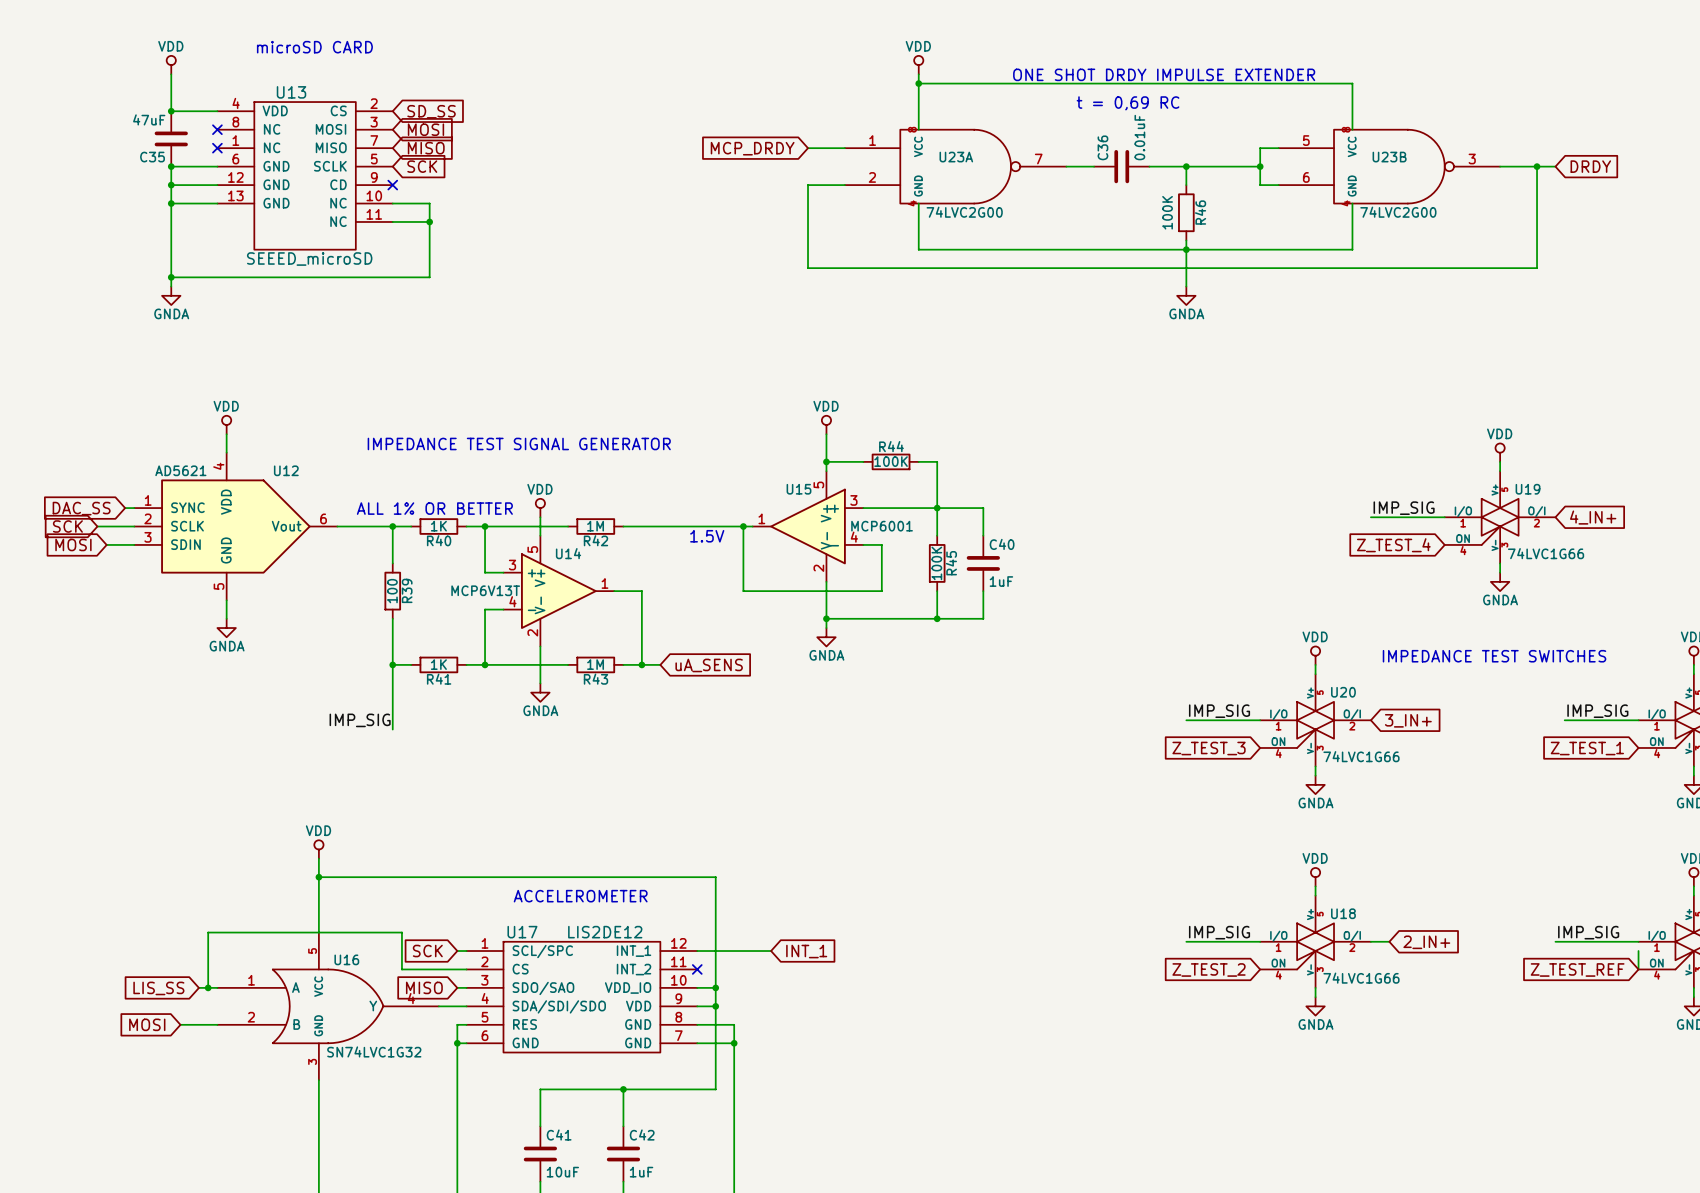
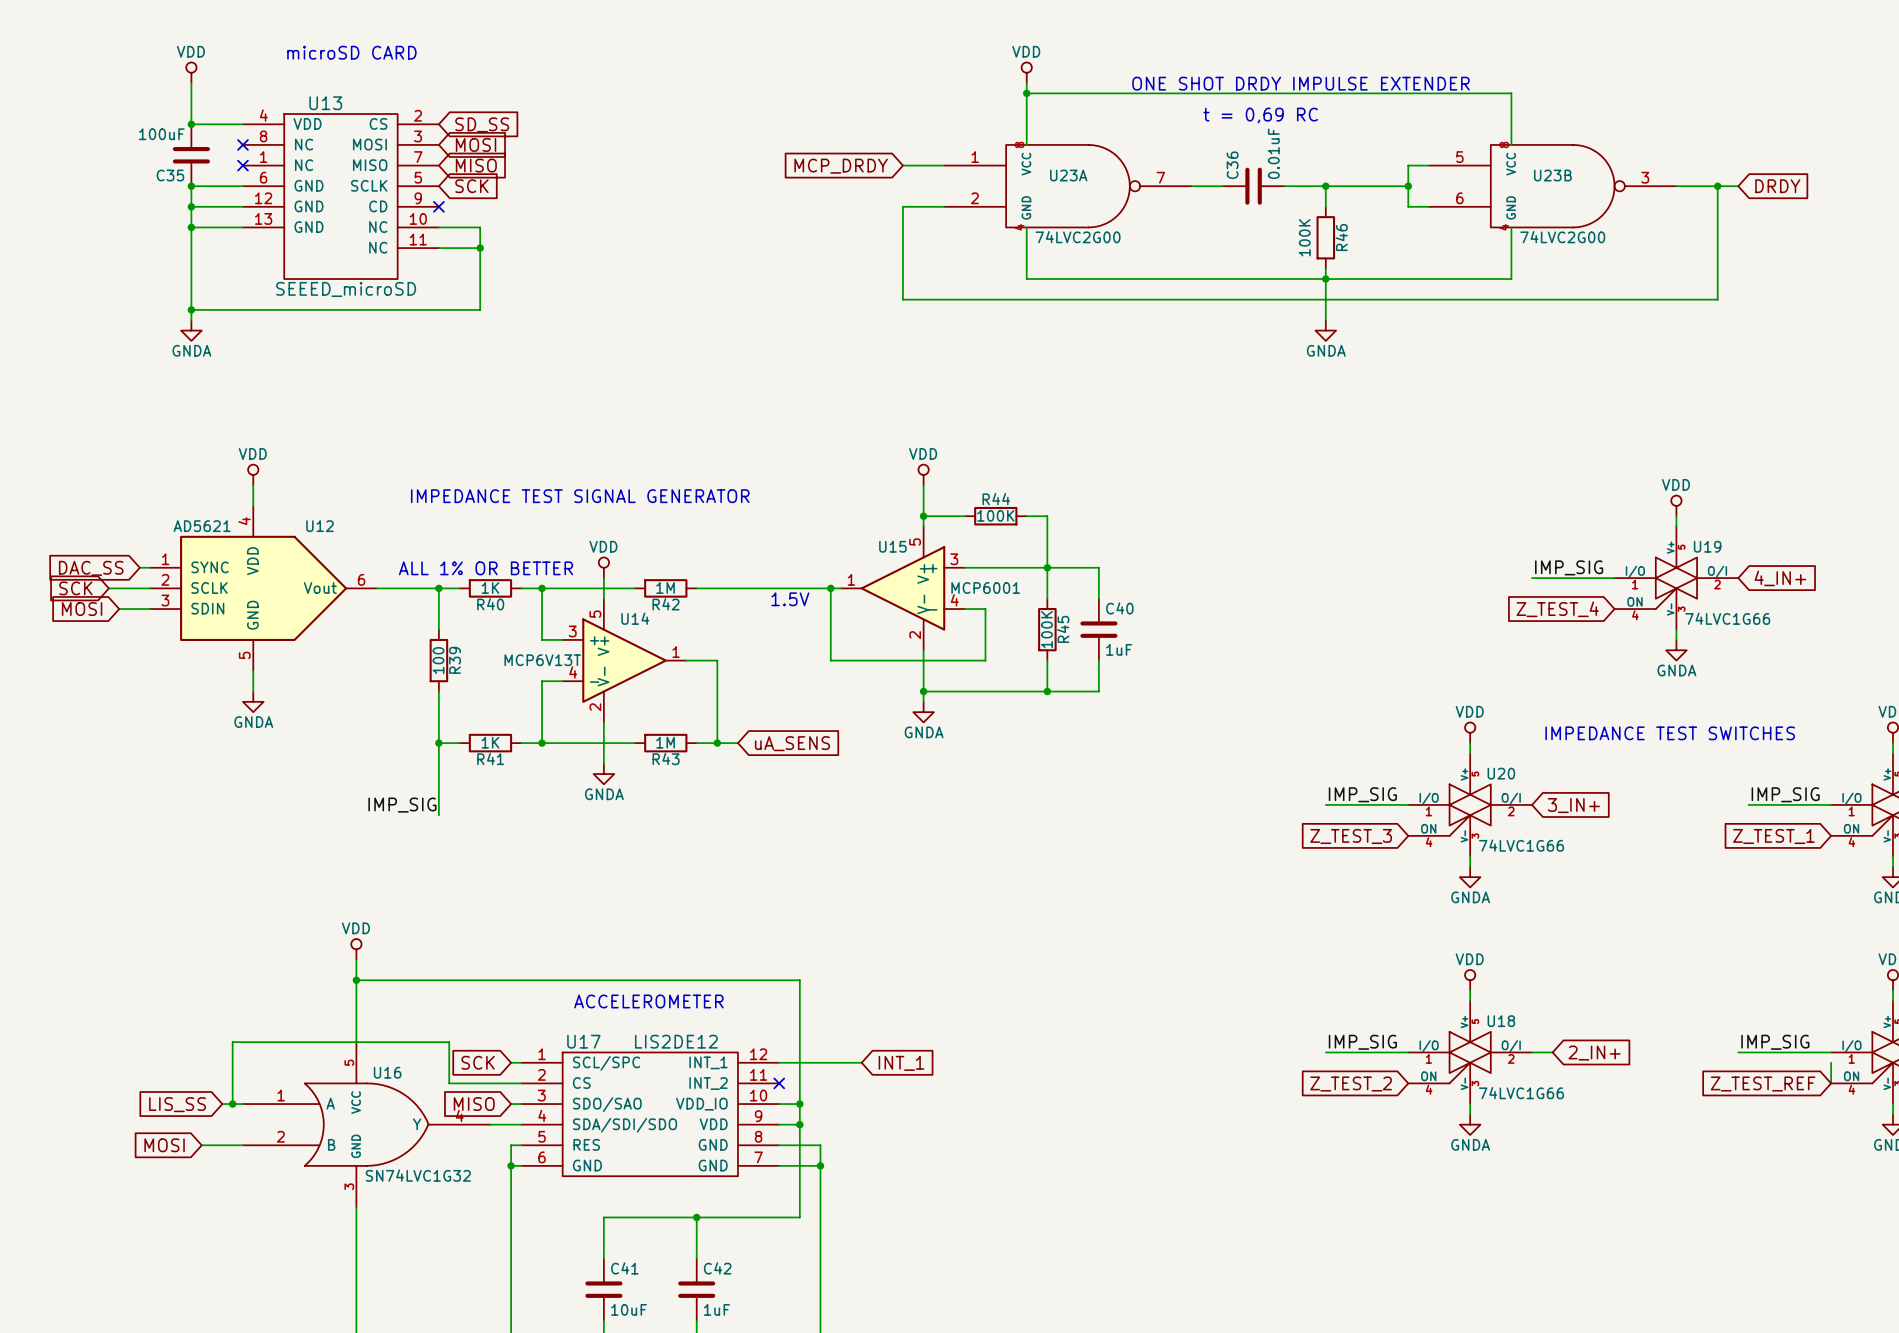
C35 value: 47uF (149, 119) -> 100uF (161, 134)

